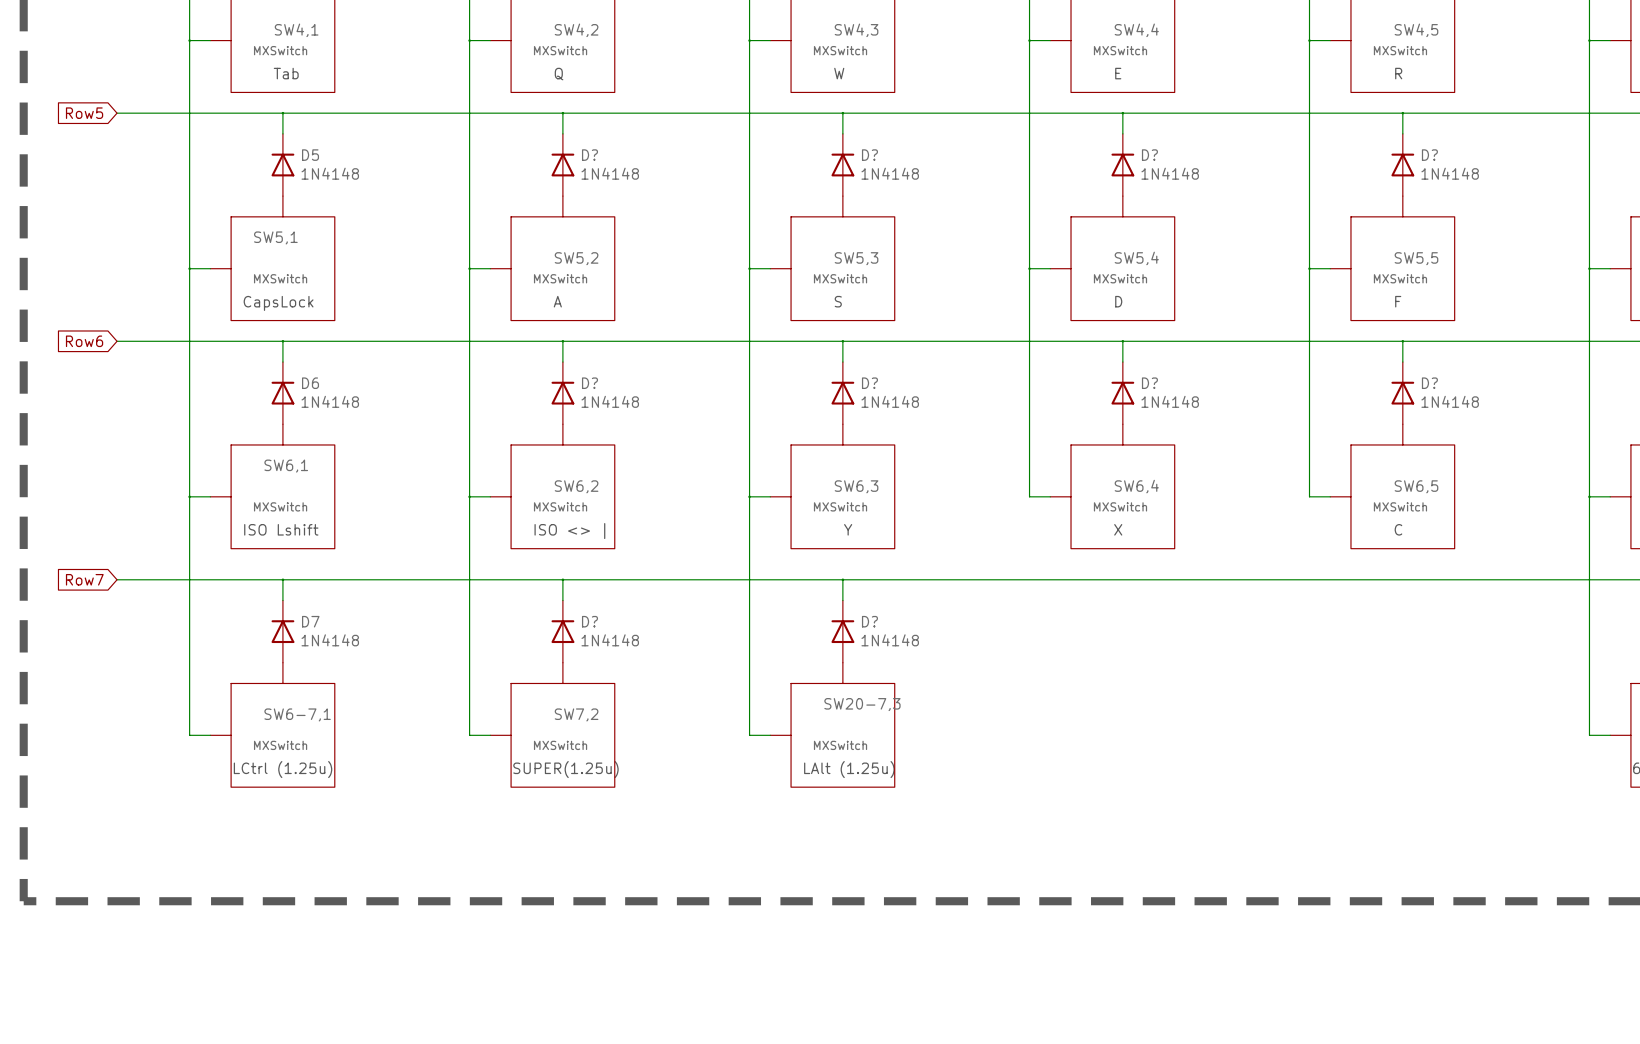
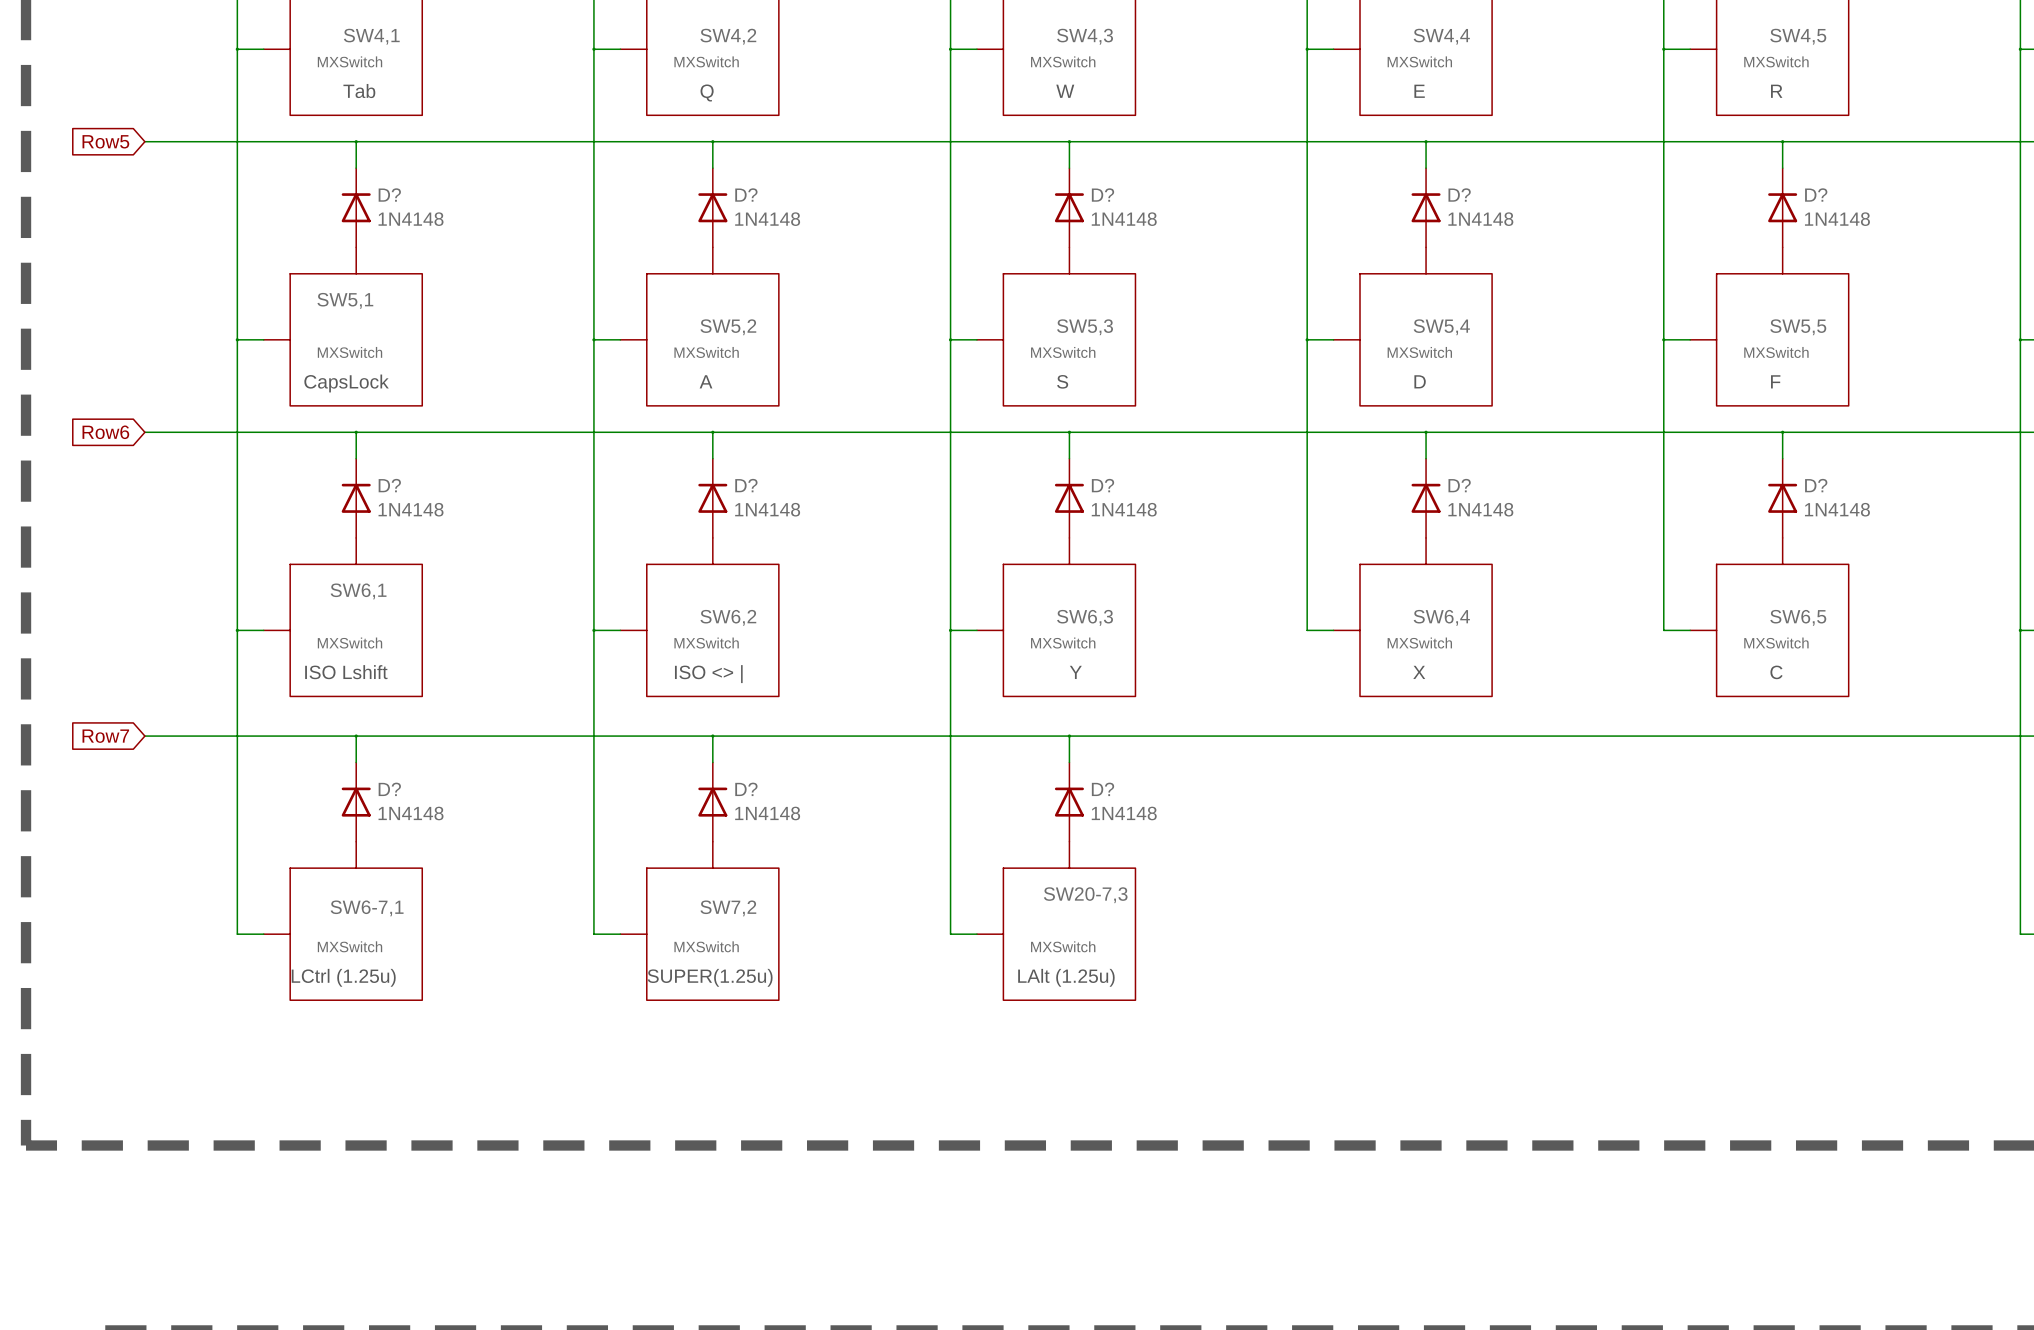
D5 name: D5 (310, 155) -> D? (389, 195)
D6 name: D6 (310, 383) -> D? (389, 485)
D7 name: D7 (310, 621) -> D? (389, 789)

